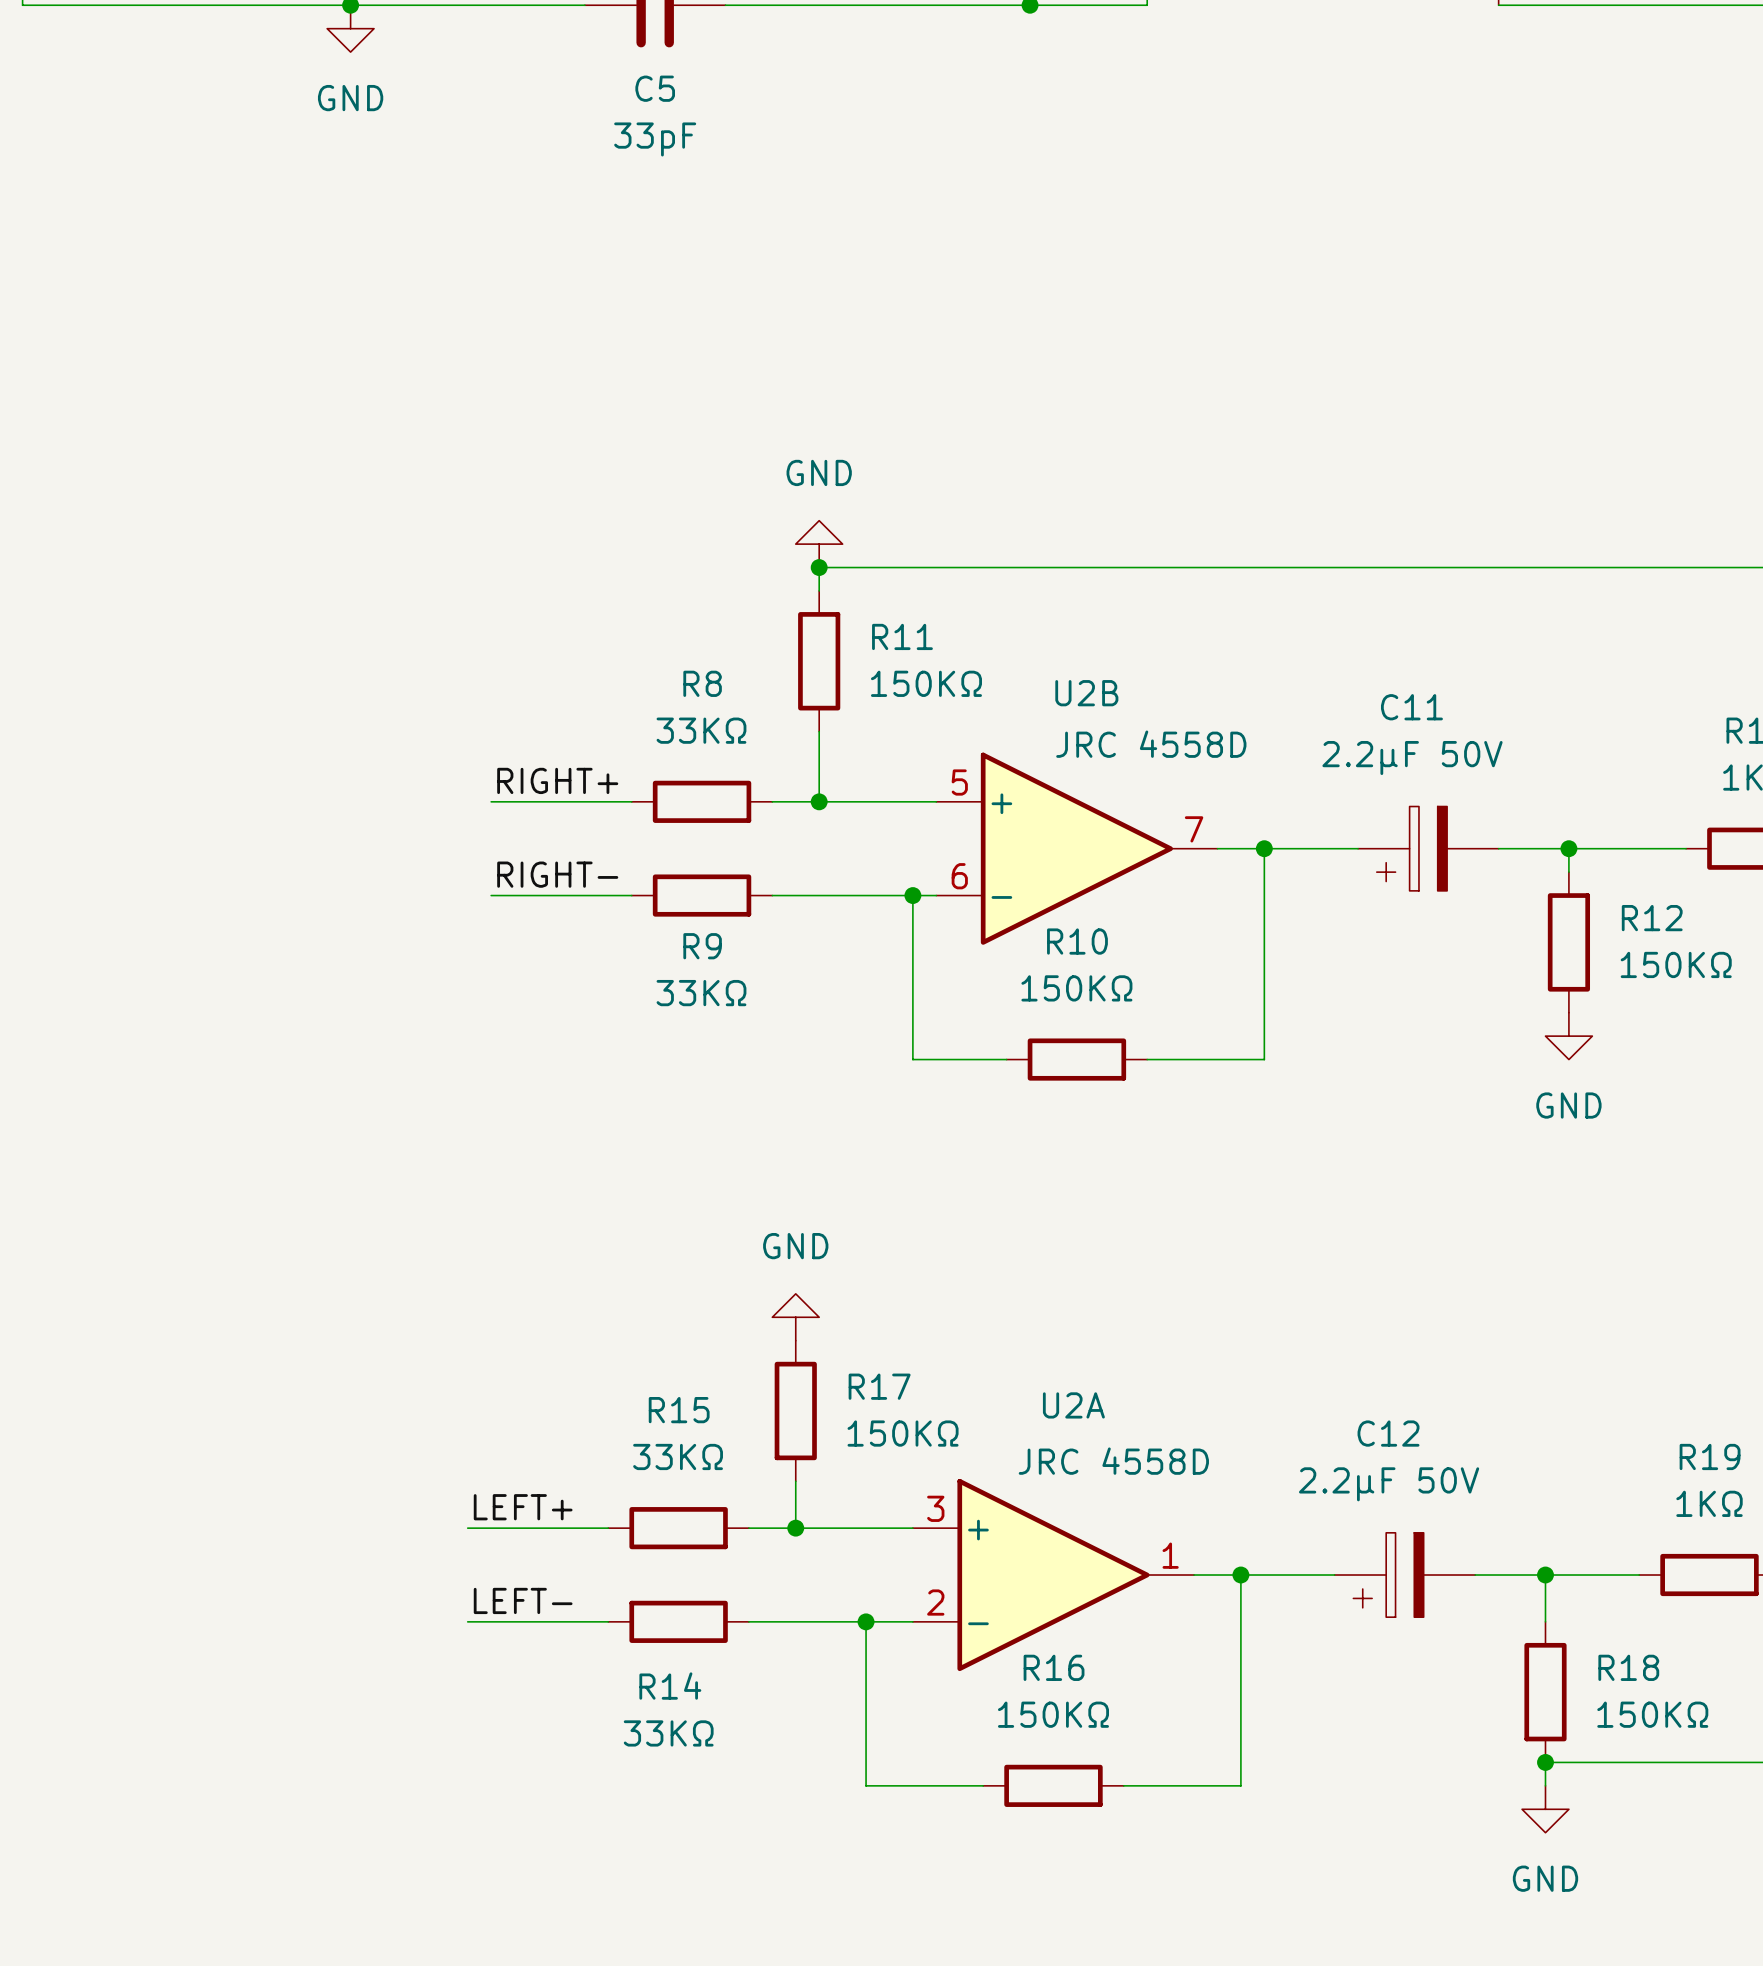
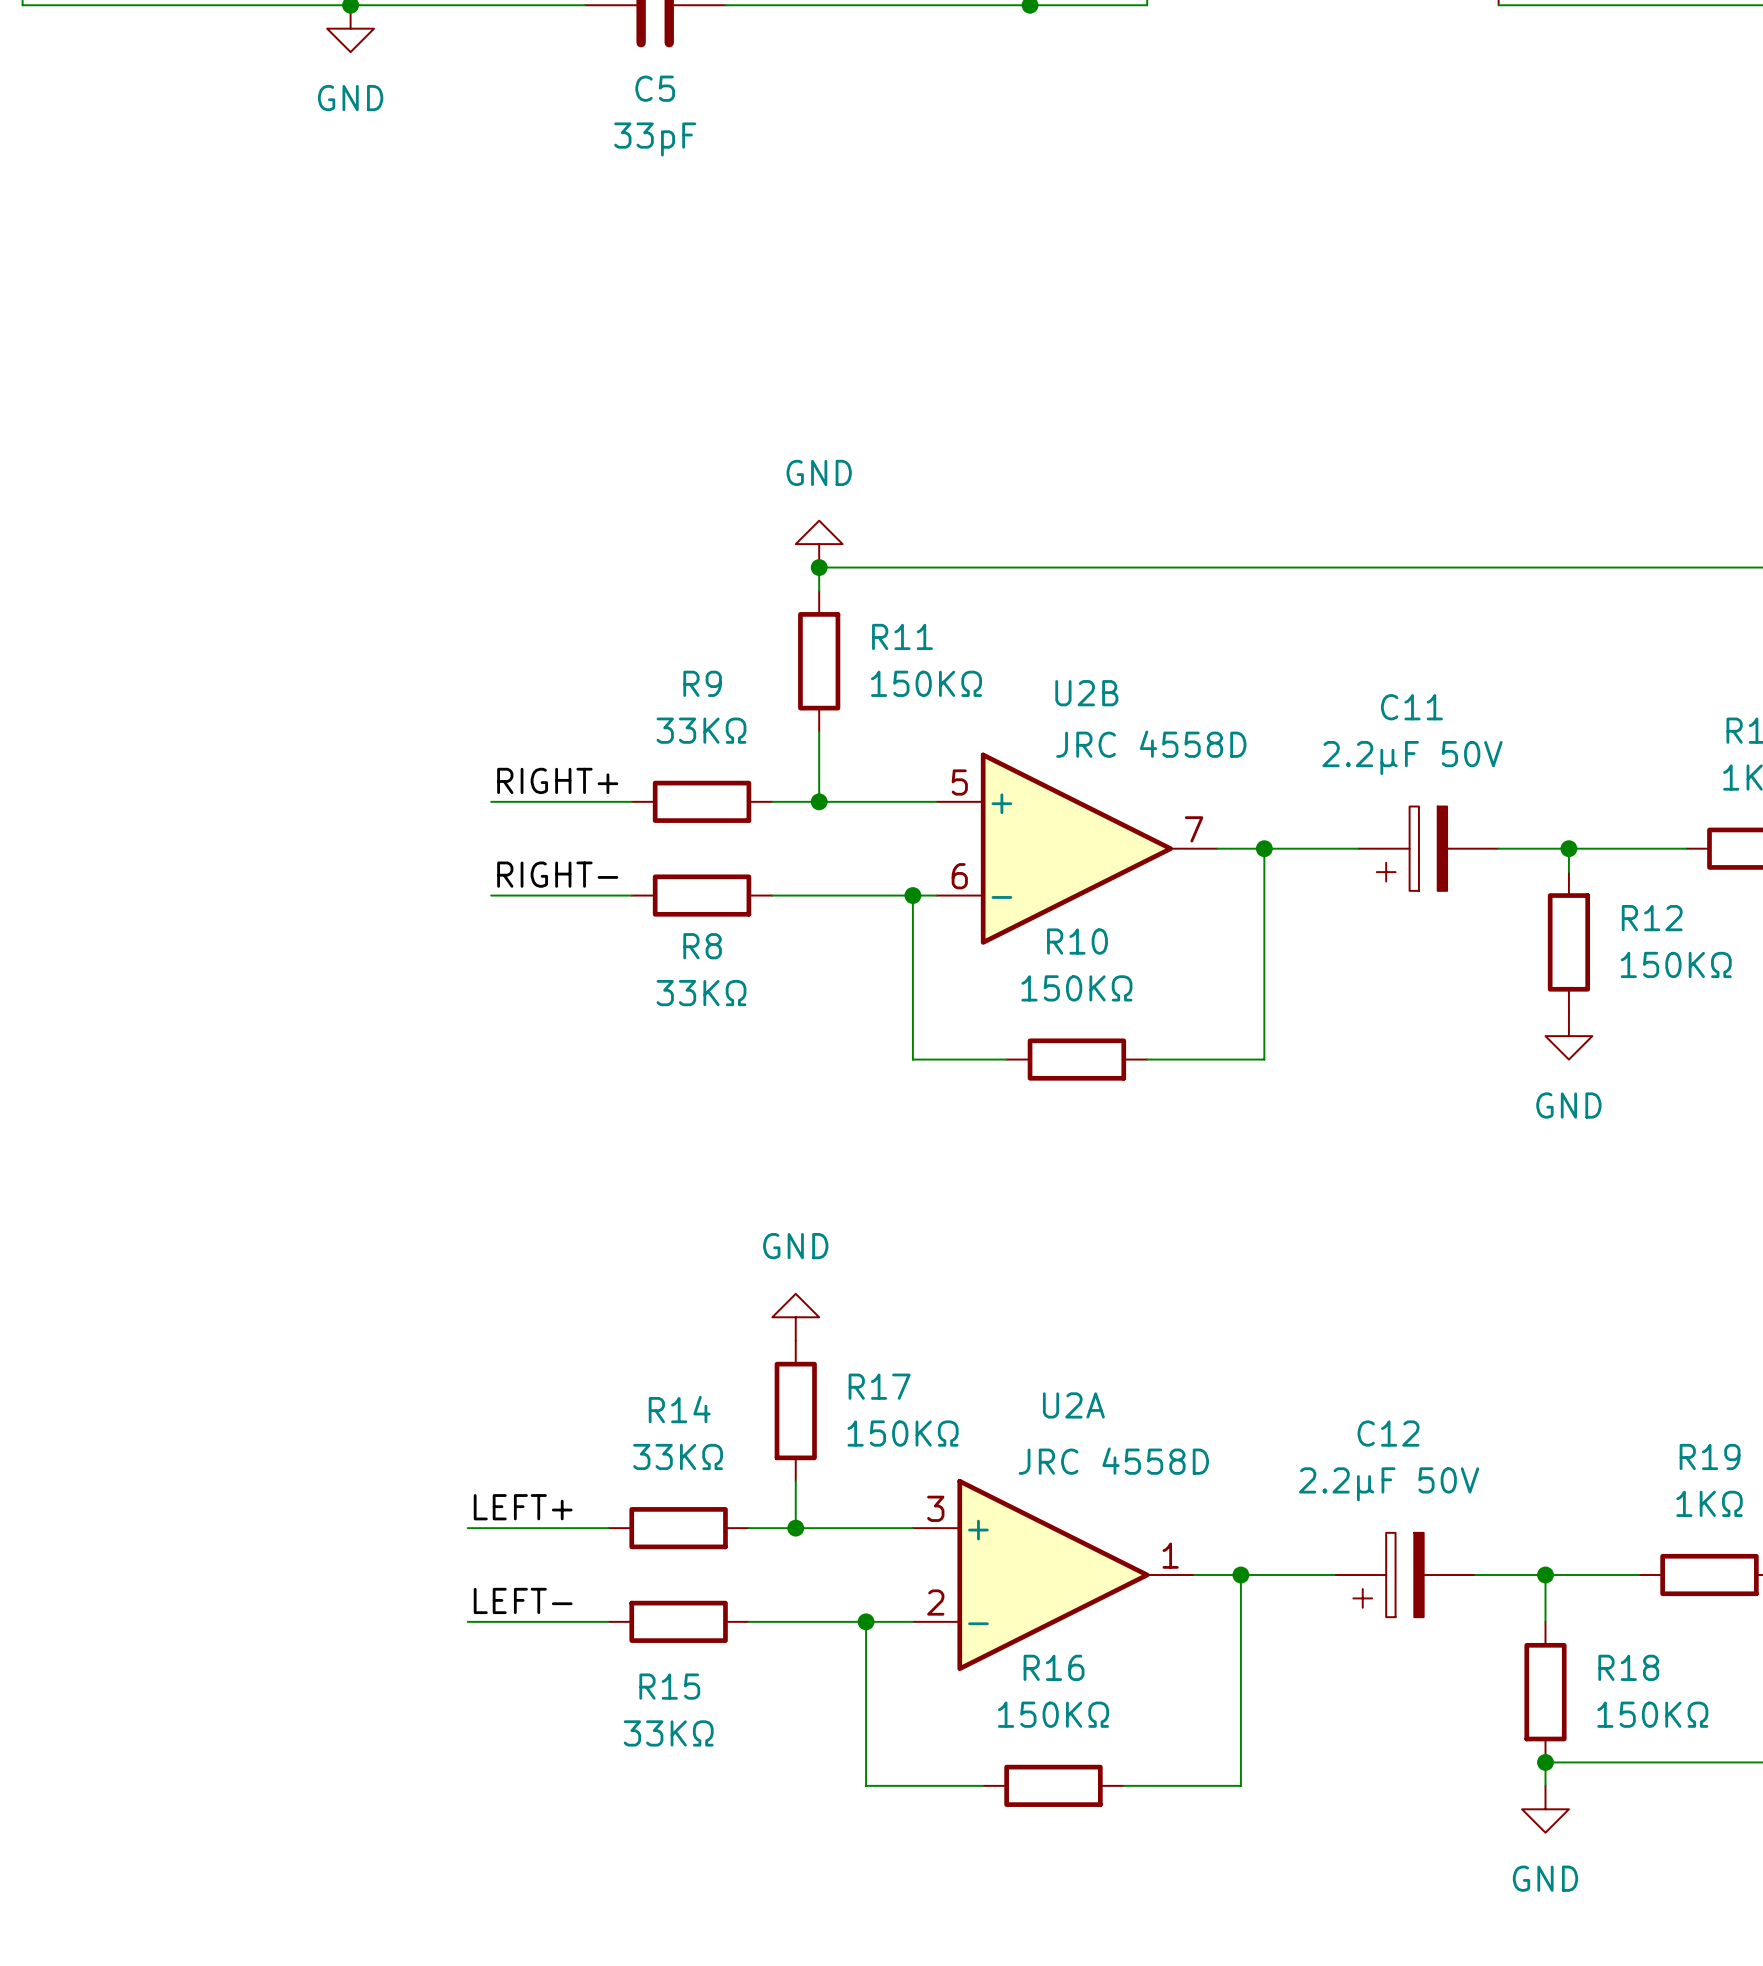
R8 name: R8 (702, 683) -> R9 (702, 683)
R9 name: R9 (702, 946) -> R8 (702, 946)
R15 name: R15 (679, 1410) -> R14 (679, 1409)
R14 name: R14 (670, 1686) -> R15 (669, 1686)

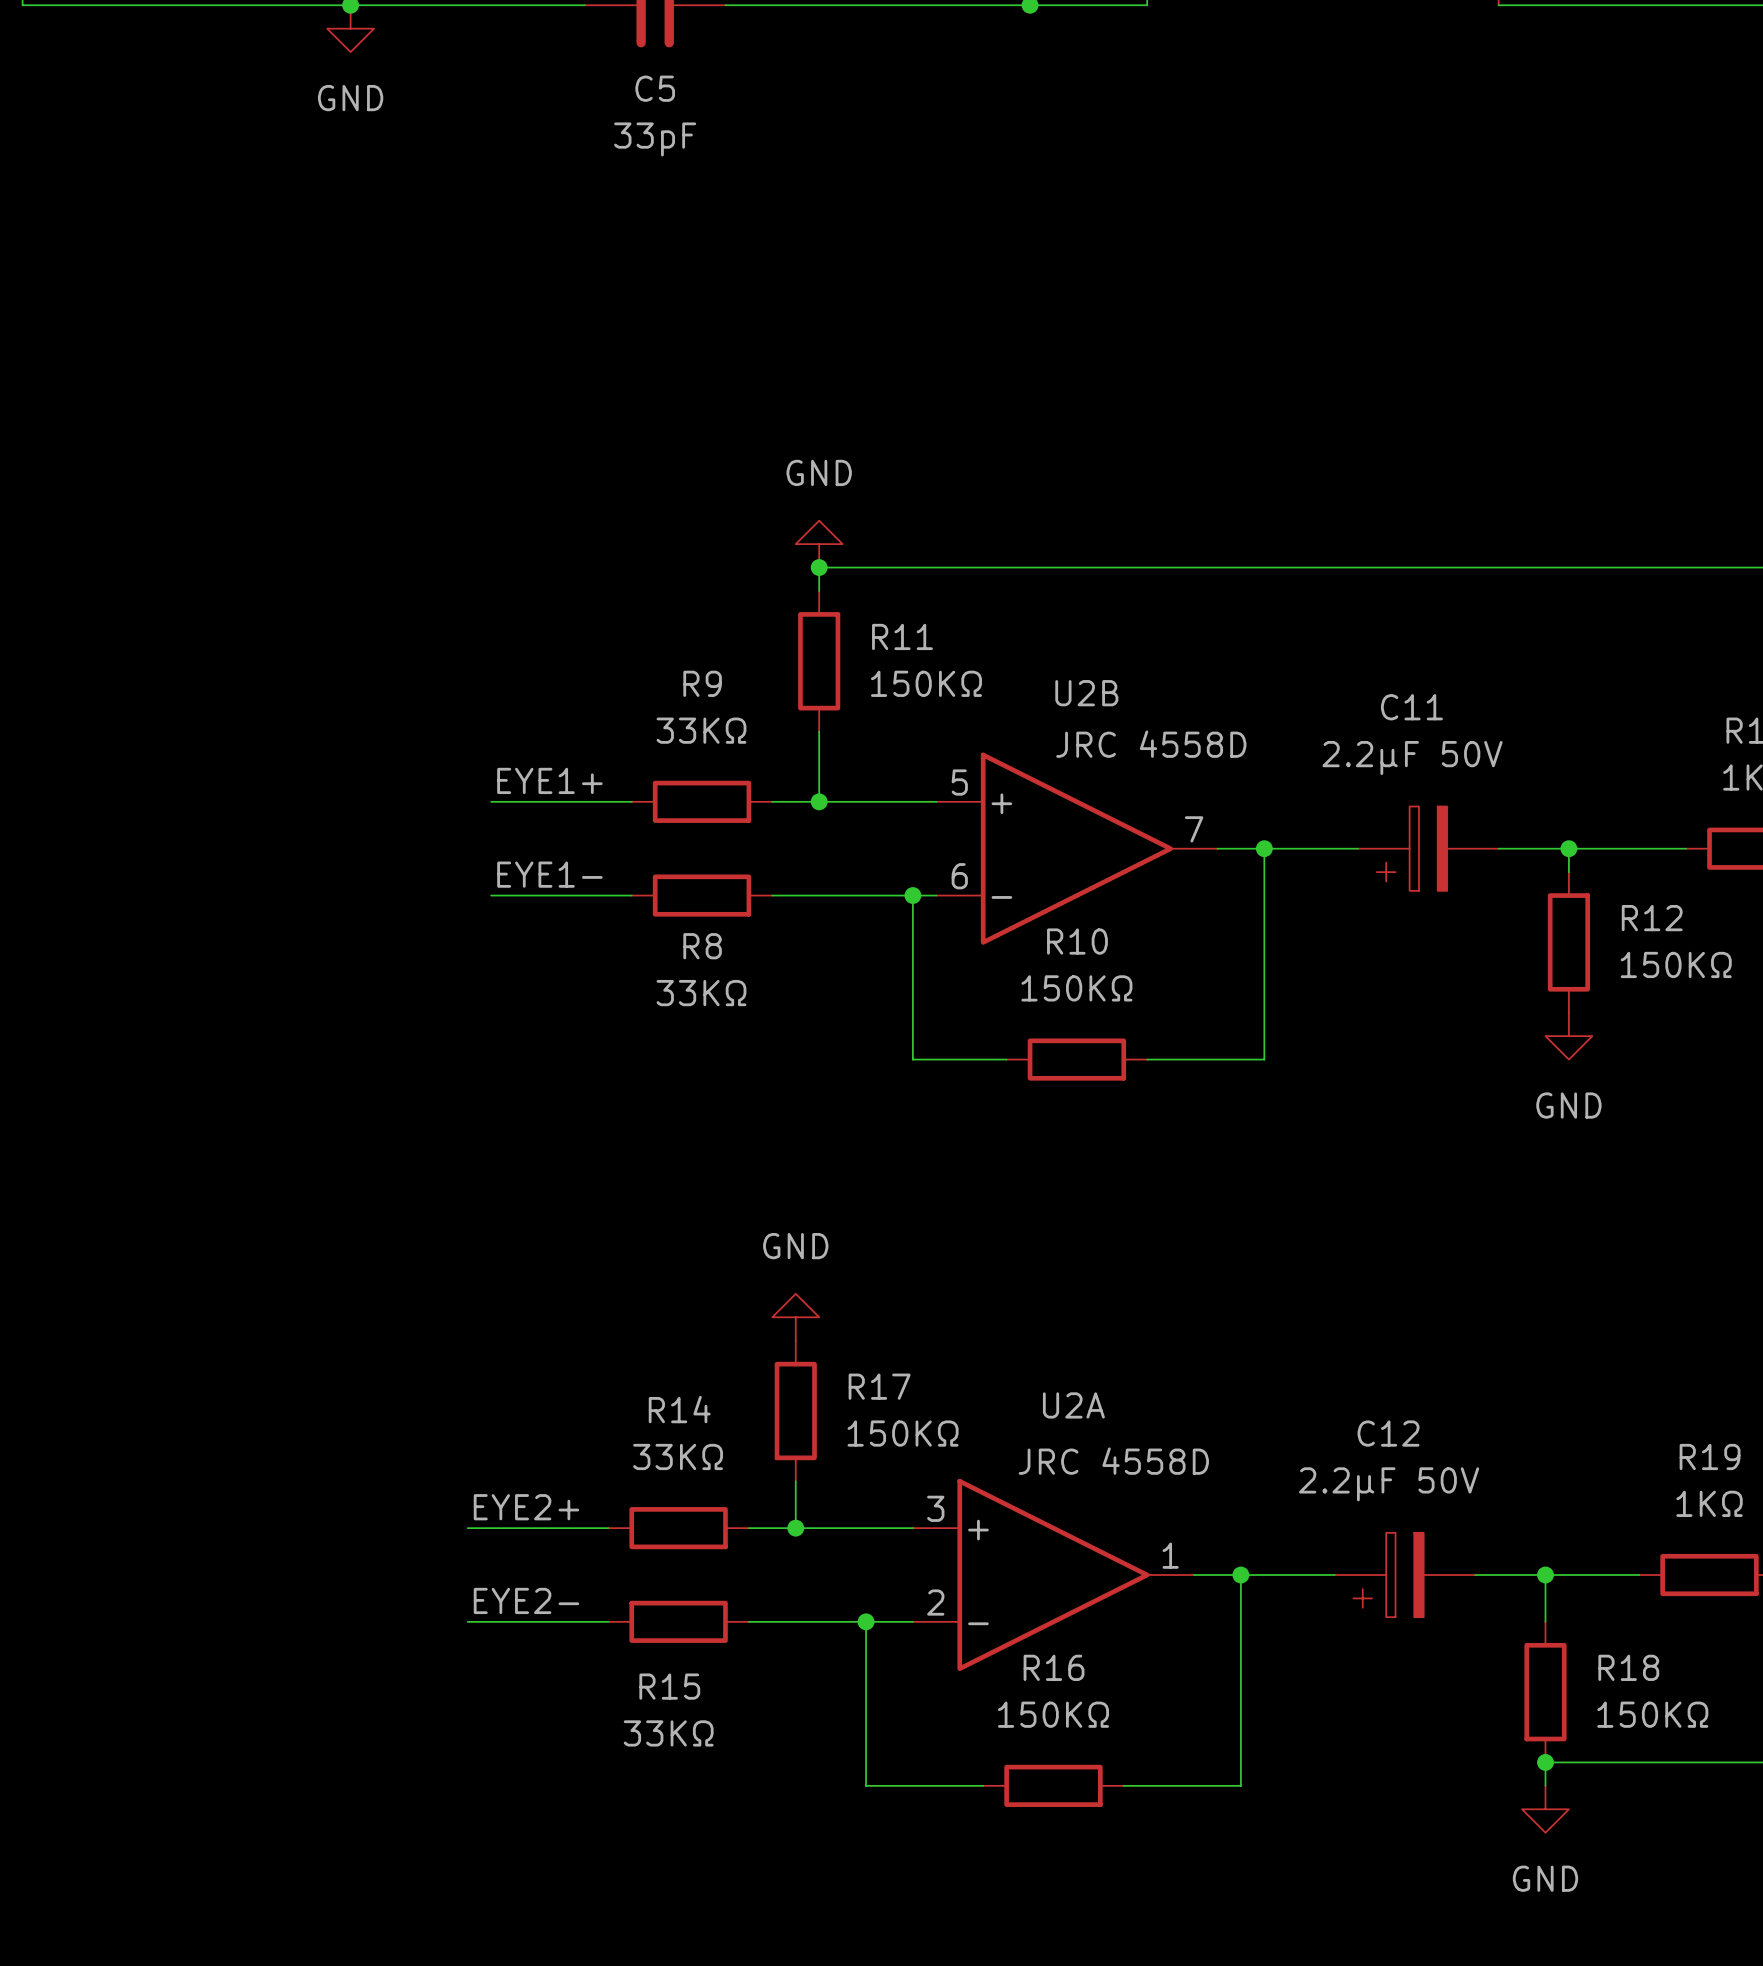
label: RIGHT+ (557, 780) -> EYE1+ (549, 780)
label: RIGHT- (557, 874) -> EYE1- (549, 874)
label: LEFT+ (523, 1507) -> EYE2+ (526, 1507)
label: LEFT- (523, 1600) -> EYE2- (526, 1600)

